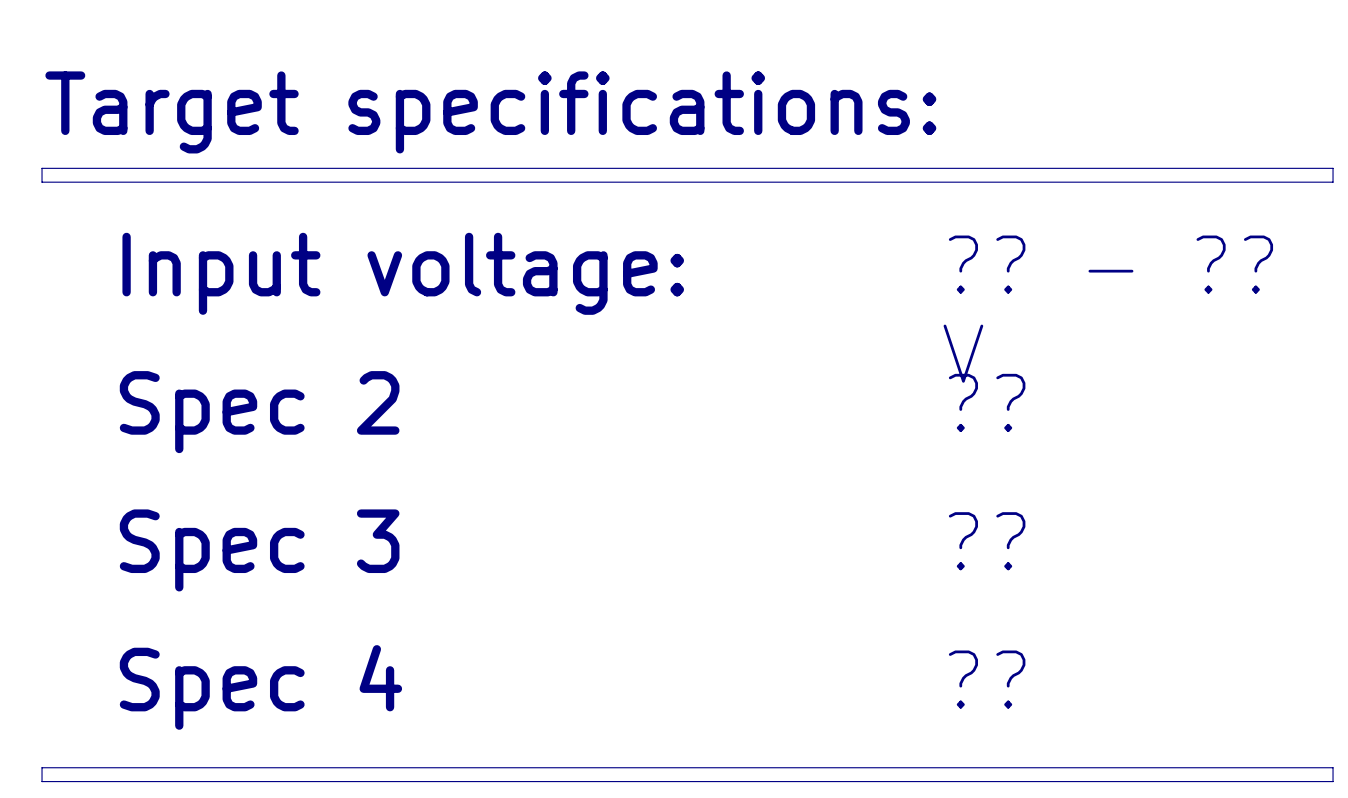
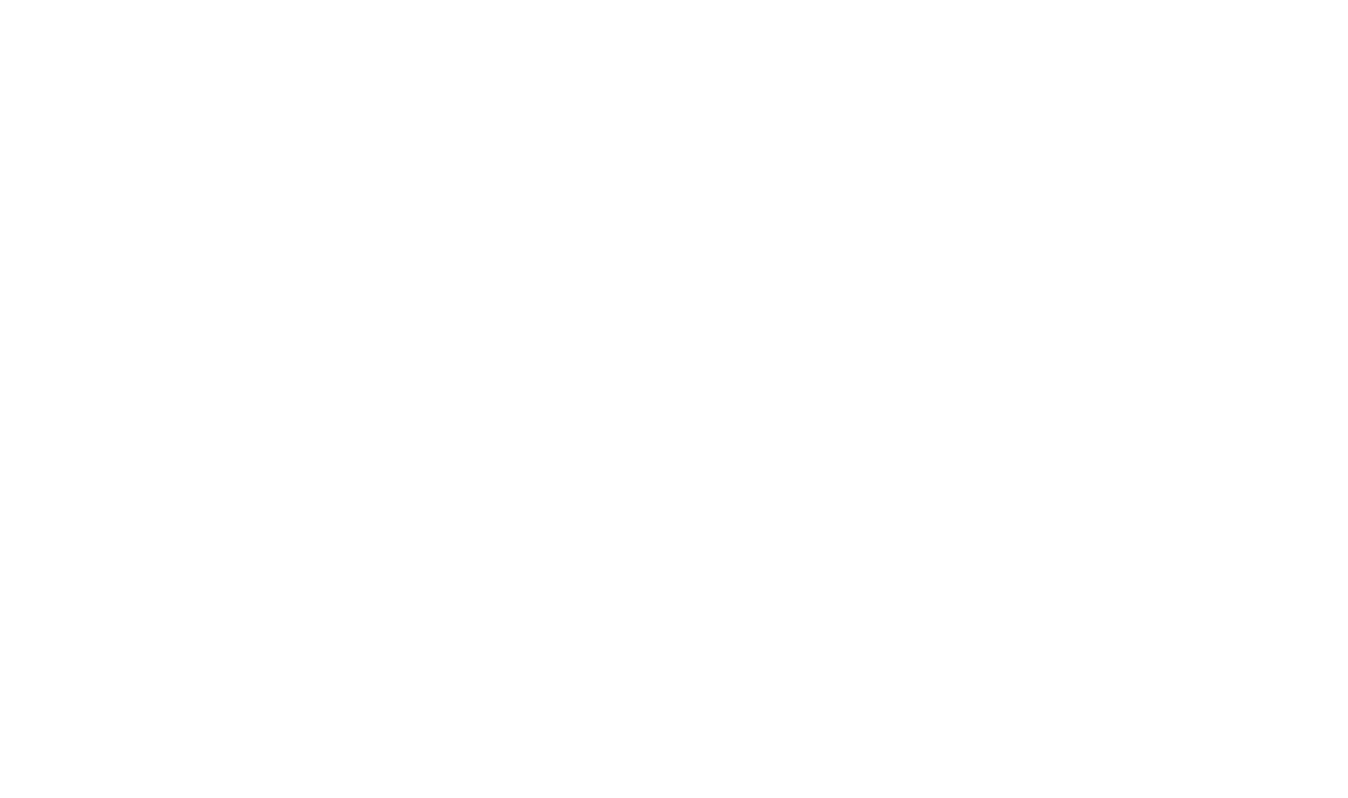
text: Target specifications: (490, 112) -> none
line: (42, 168) (42, 182) (1333, 182) (1333, 168) (42, 168) -> none
text: ?? - ?? (1110, 264) -> none
text: Input voltage: (403, 273) -> none
text: V (963, 353) -> none
text: ?? (987, 402) -> none
text: Spec 2 (259, 412) -> none
text: ?? (987, 541) -> none
text: Spec 3 (259, 550) -> none
text: ?? (987, 679) -> none
text: Spec 4 (260, 687) -> none
line: (42, 767) (1333, 767) (1333, 781) (42, 781) (42, 767) -> none

